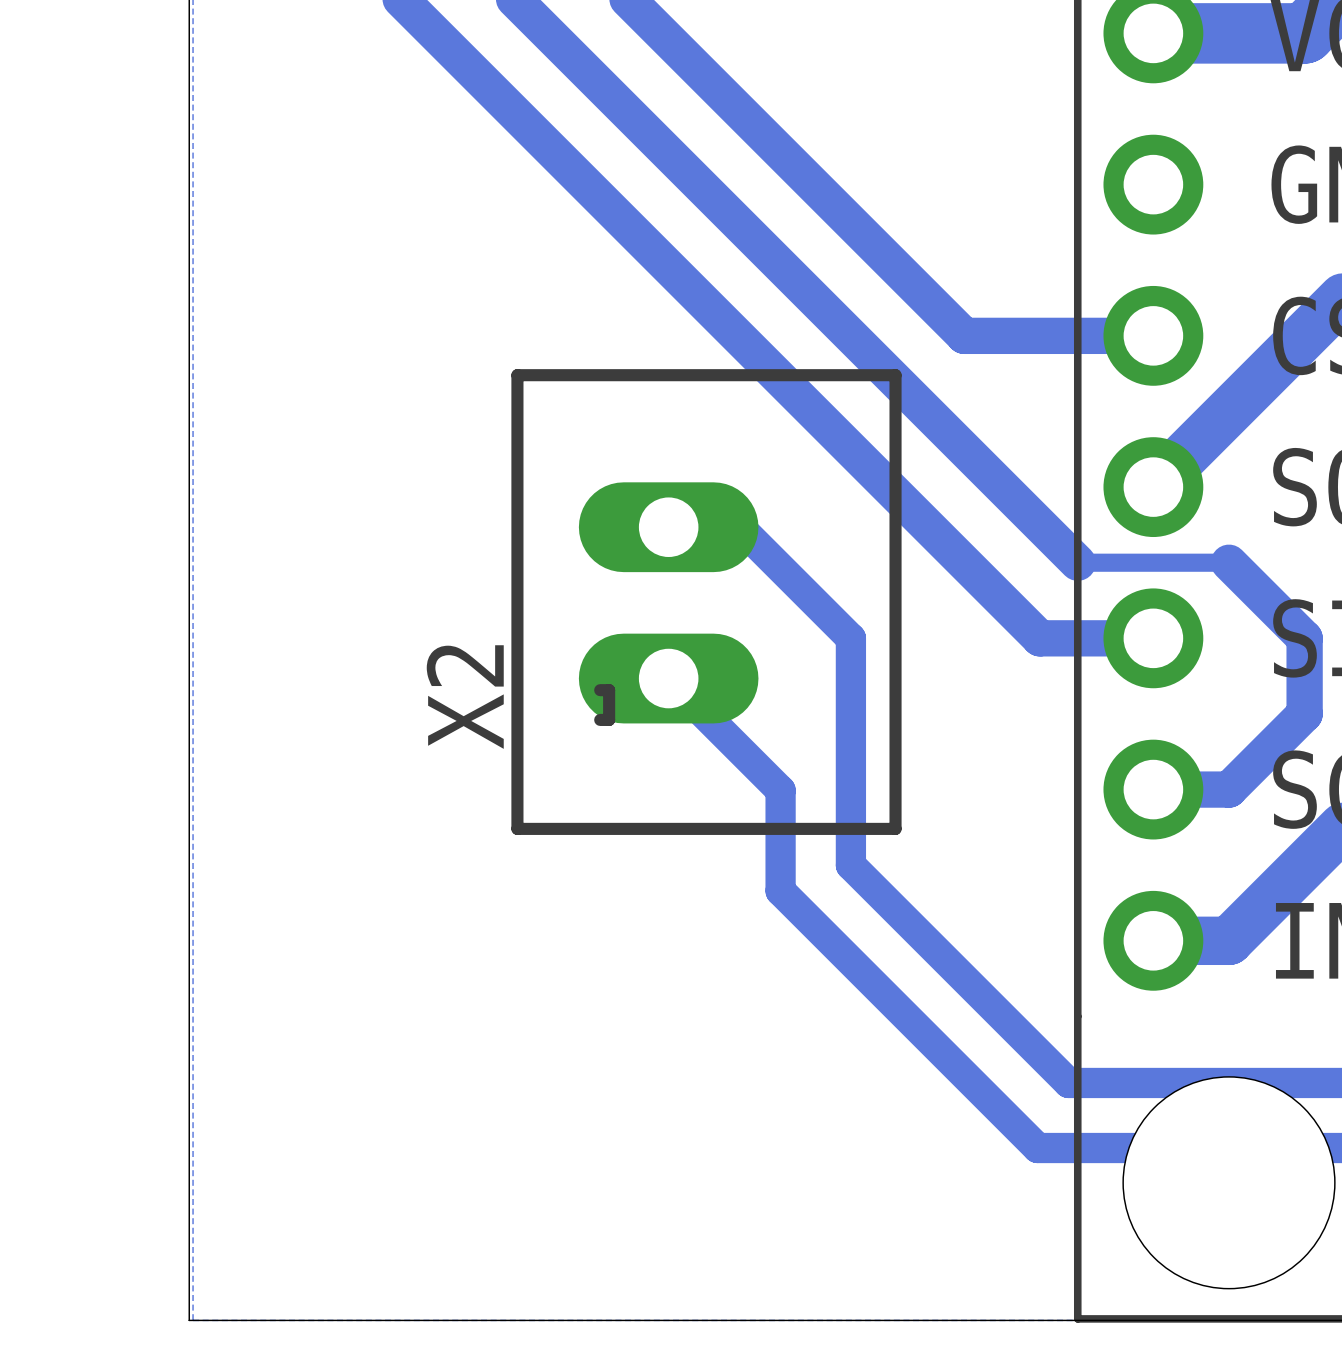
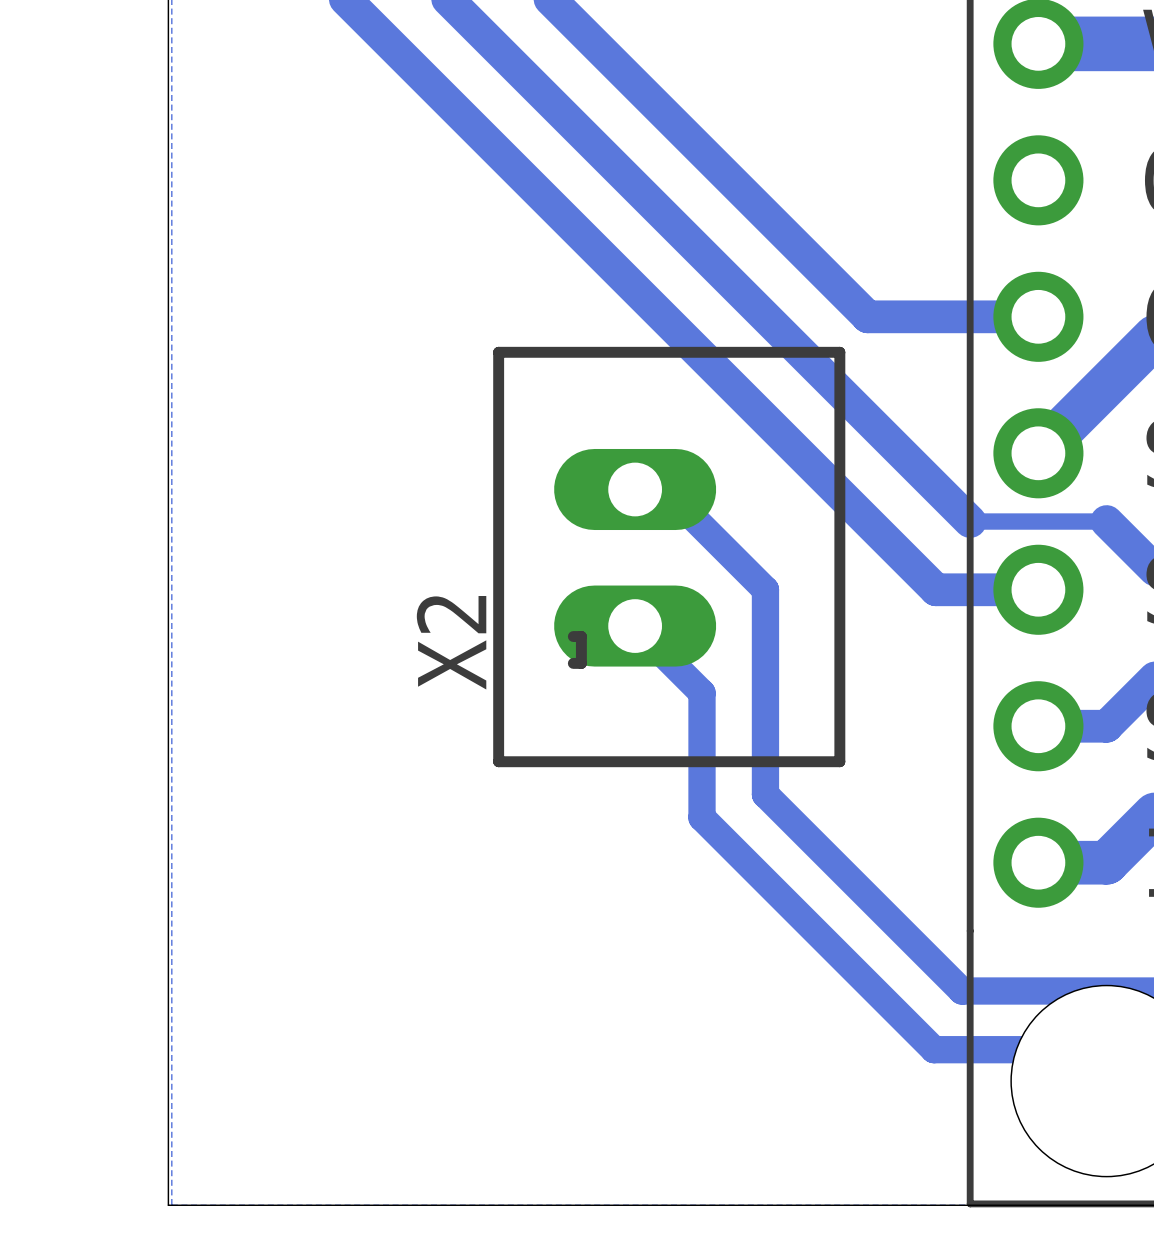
X2 position: (706, 602) -> (669, 557)
bottom track: (668, 678) (780, 790) -> (635, 626) (702, 692) (702, 727)

